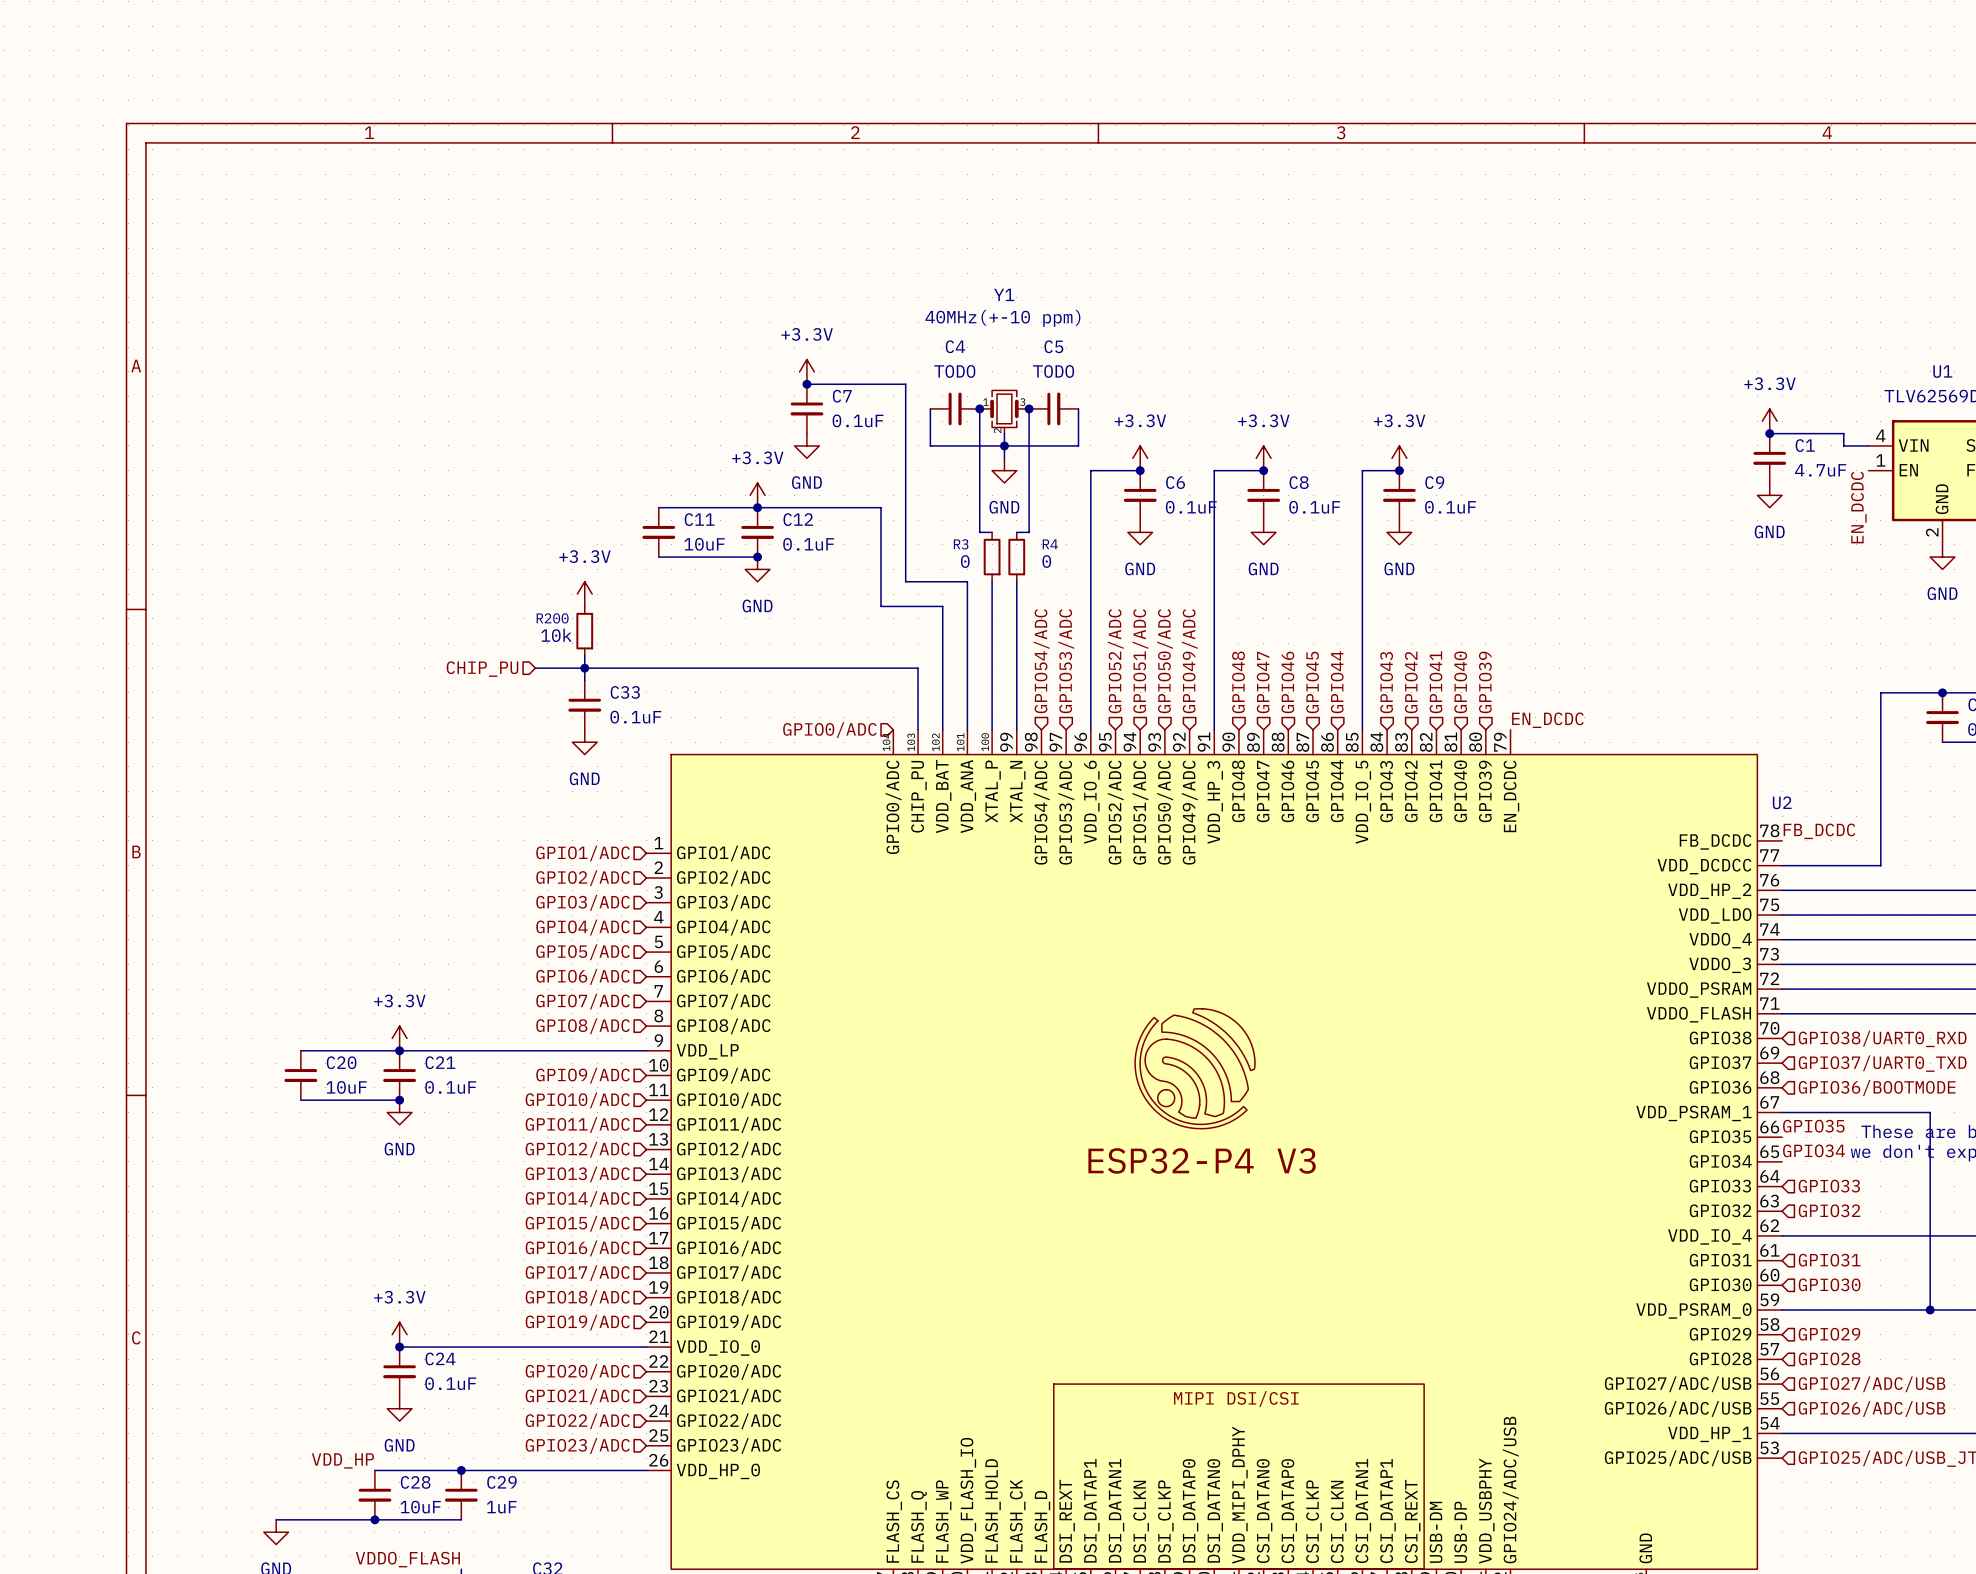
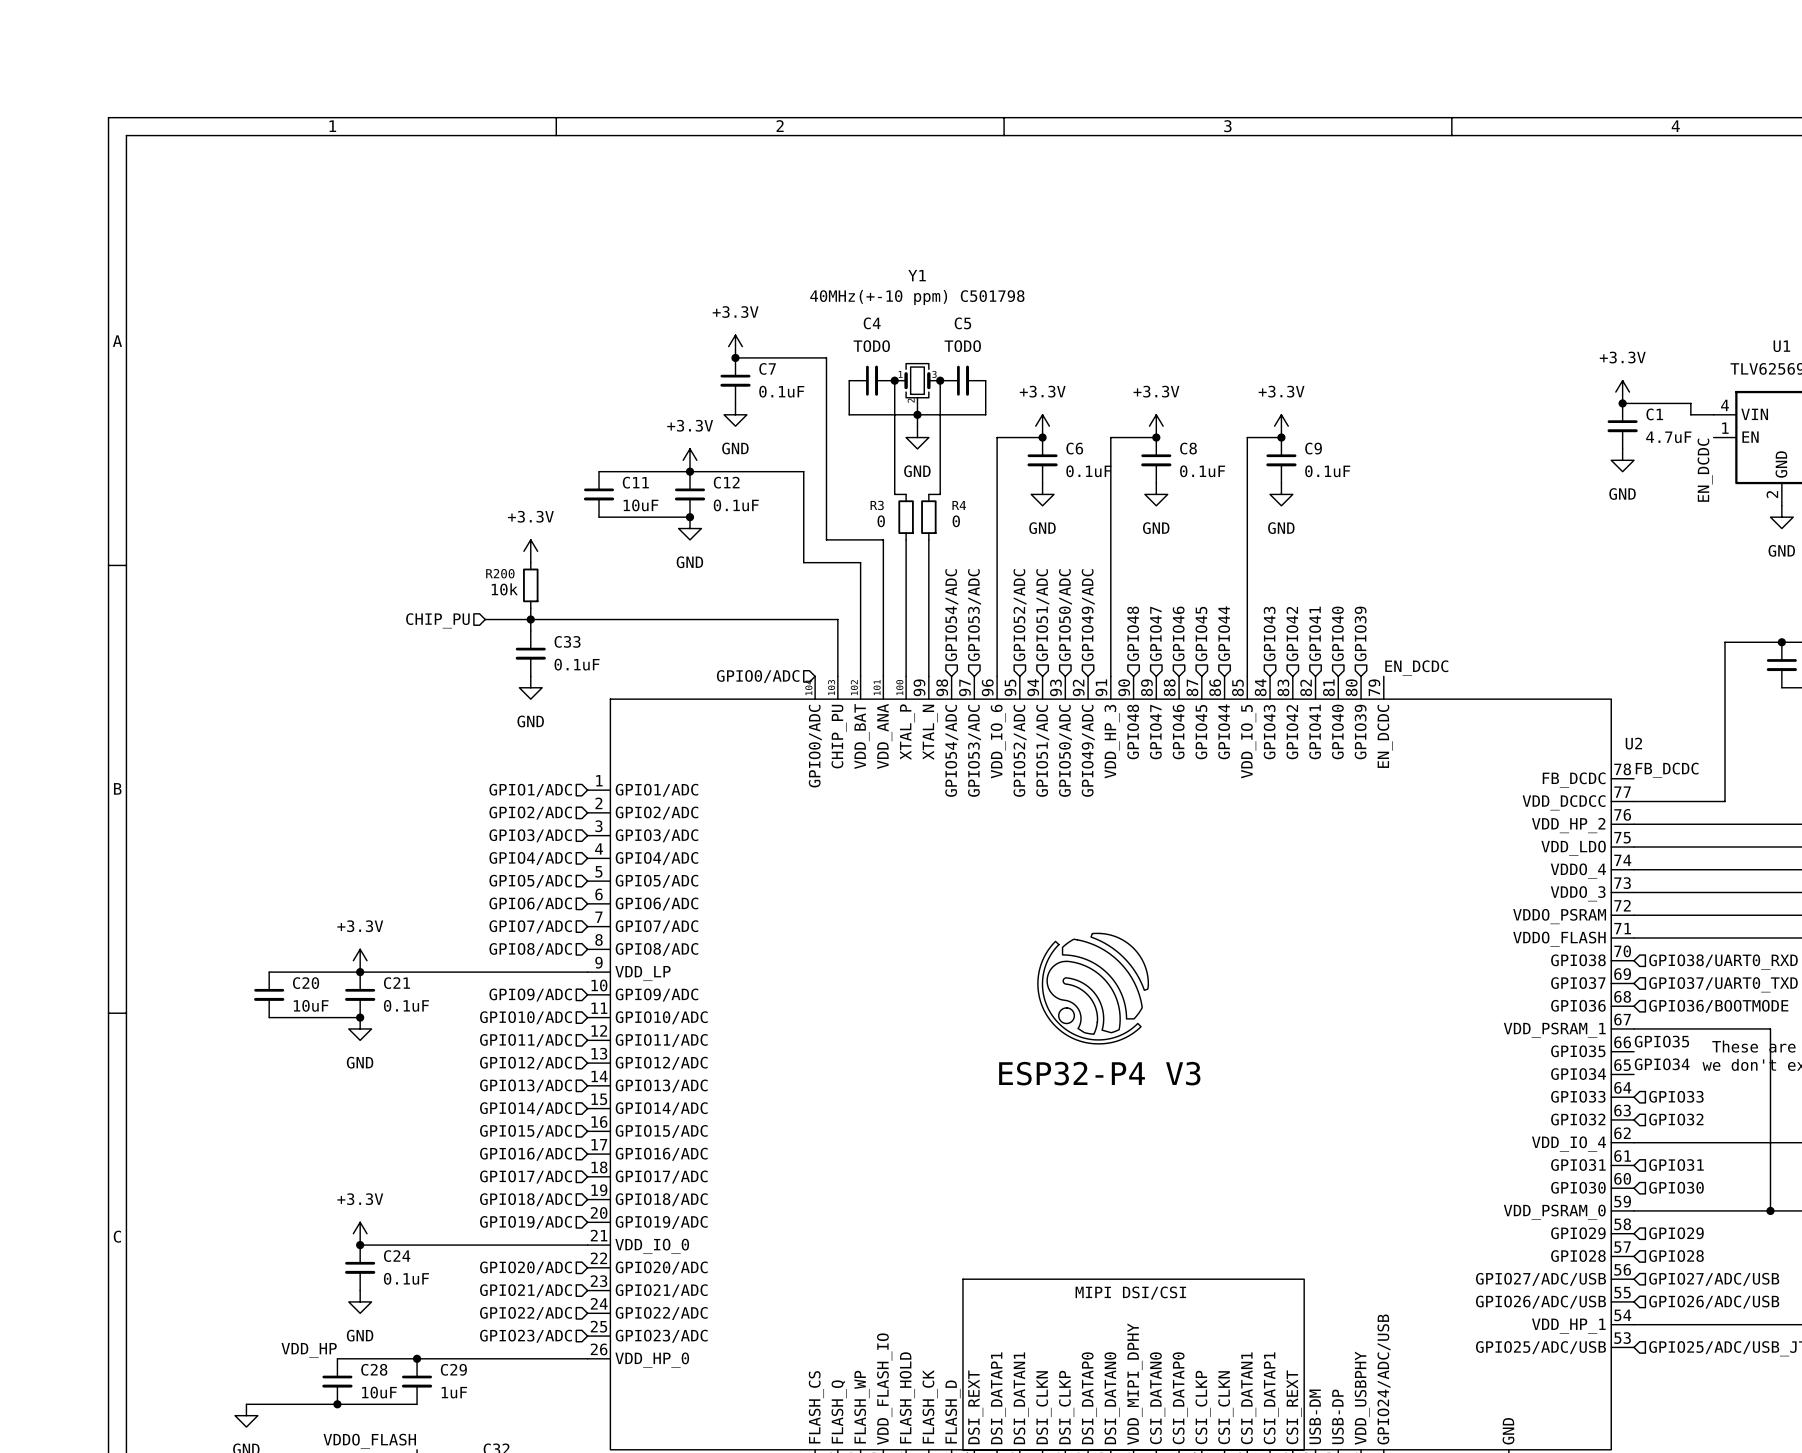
Y1 value: 40MHz(+-10 ppm) (1002, 318) -> 40MHz(+-10 ppm) C501798 (917, 297)

